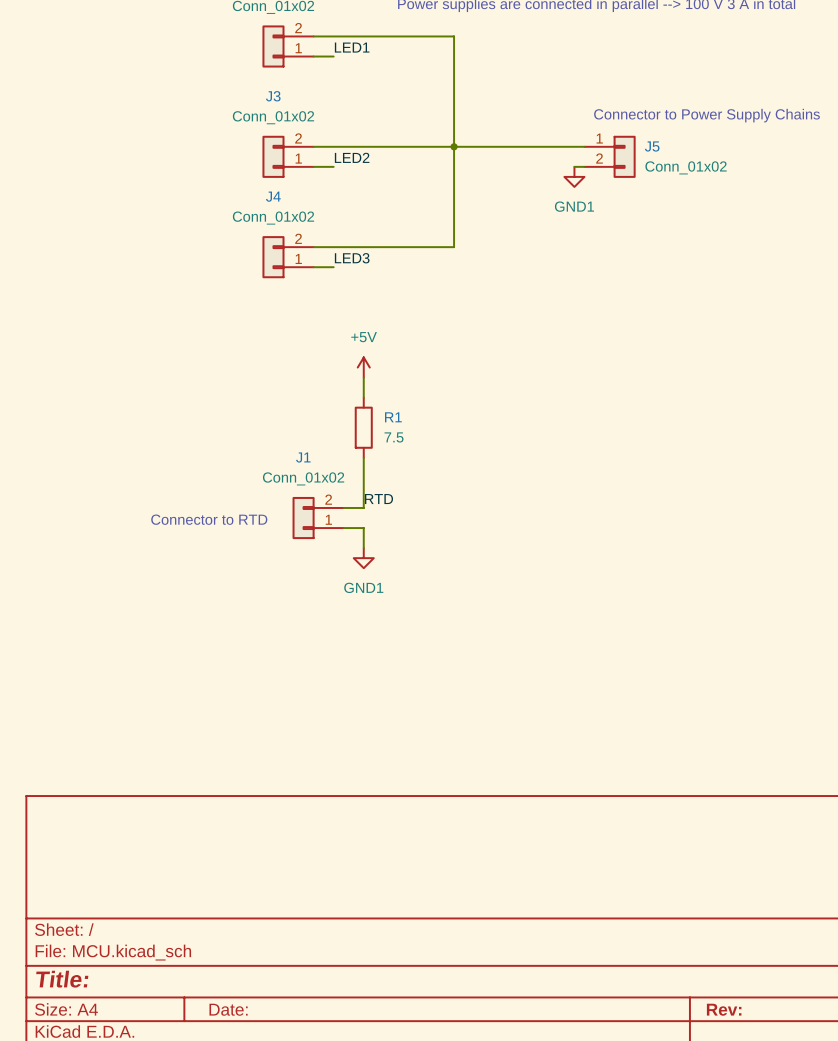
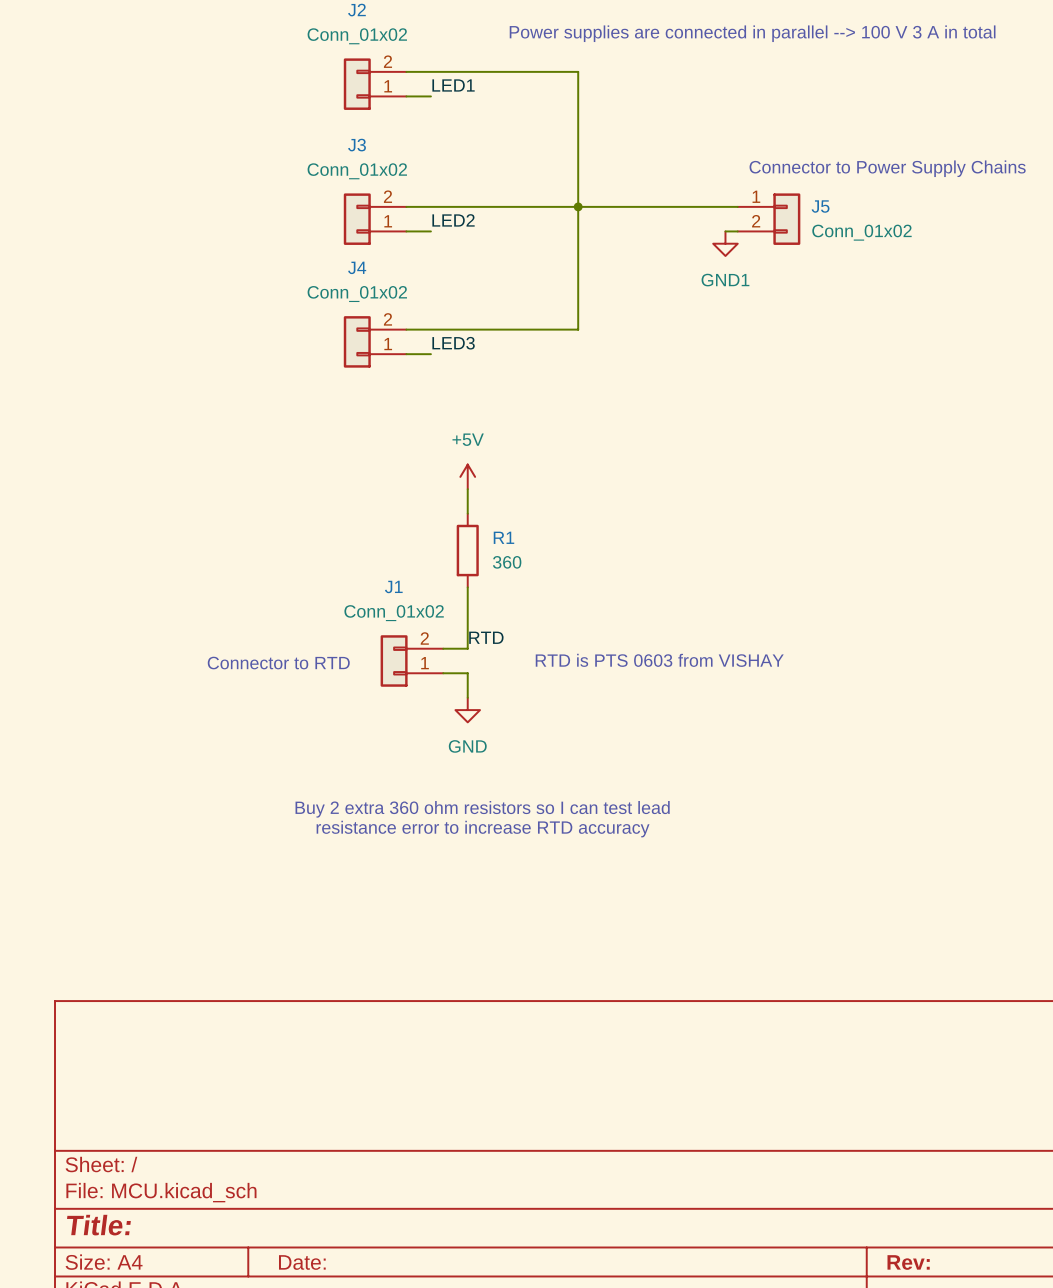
R1 value: 7.5 (394, 437) -> 360 (507, 562)
text: none -> RTD is PTS 0603 from VISHAY (659, 660)
power symbol: GND1 (363, 558) -> GND (467, 710)
text: none -> Buy 2 extra 360 ohm resistors so I can test lead (482, 809)
text: none -> resistance error to increase RTD accuracy (483, 829)

